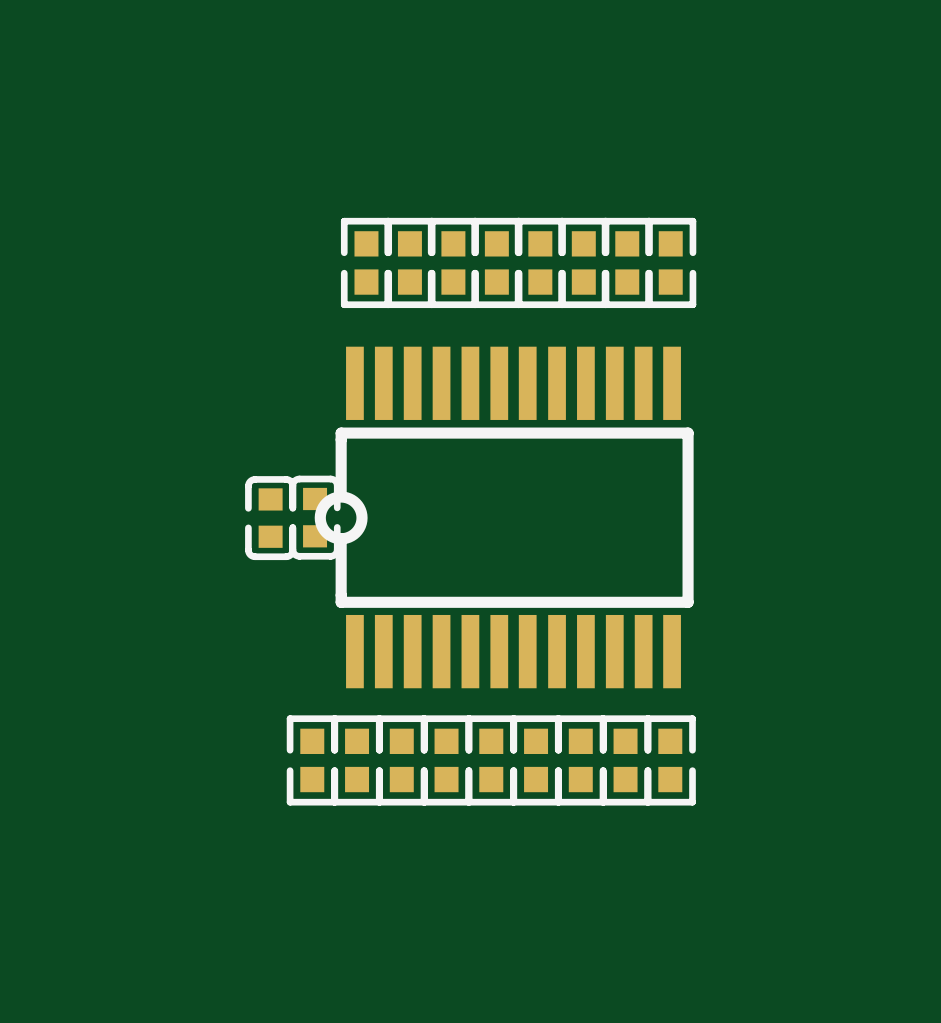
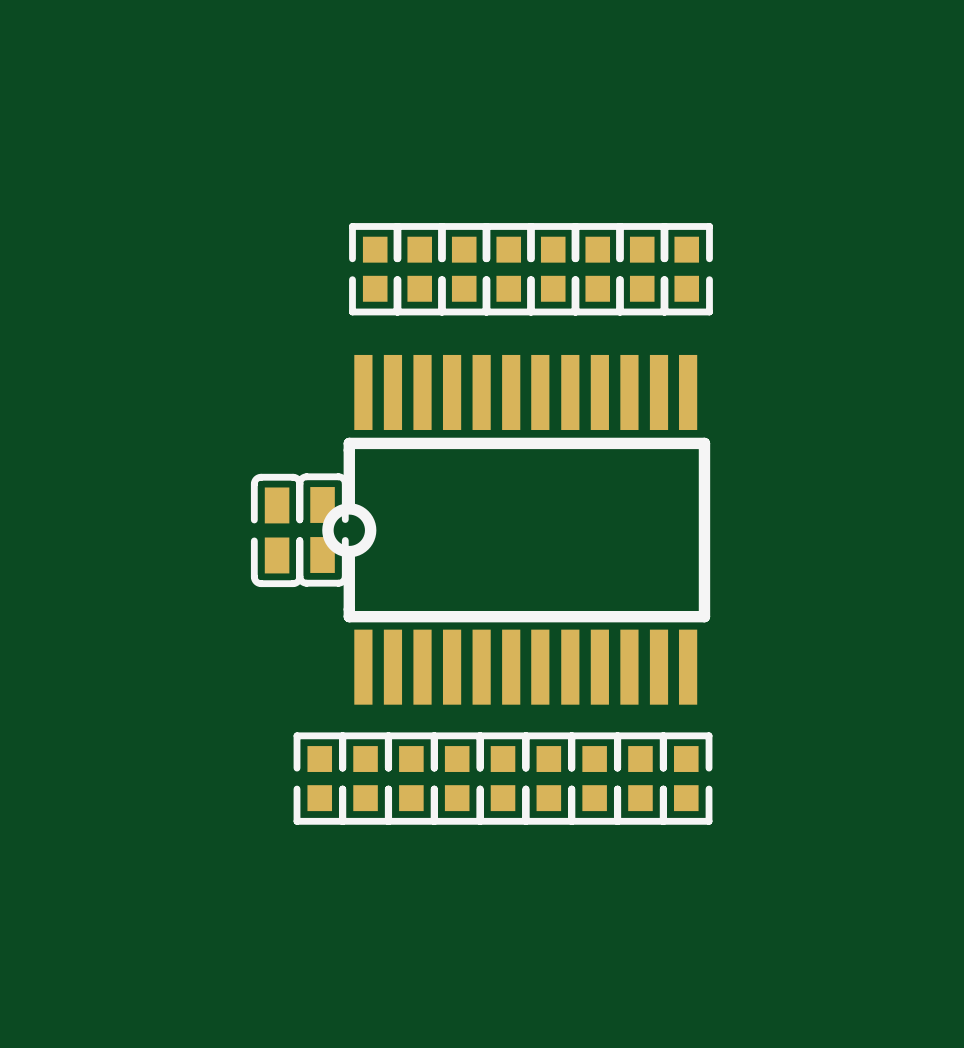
part footprint: [289, 475, 341, 560] -> [296, 473, 349, 587]
part footprint: [245, 476, 297, 561] -> [250, 473, 304, 588]

